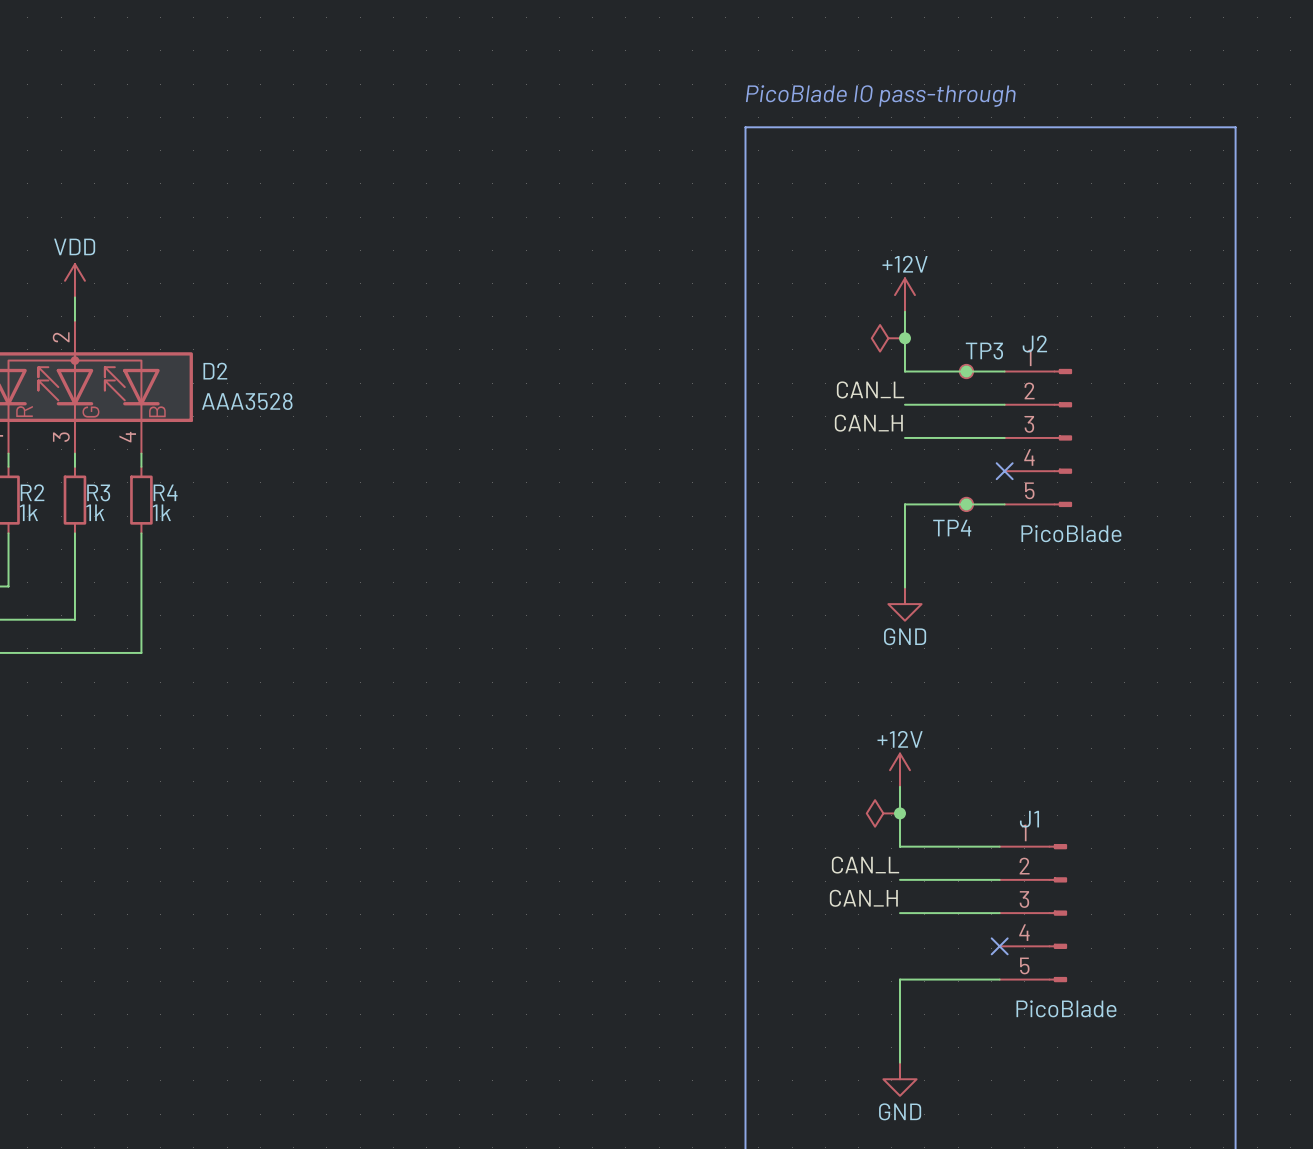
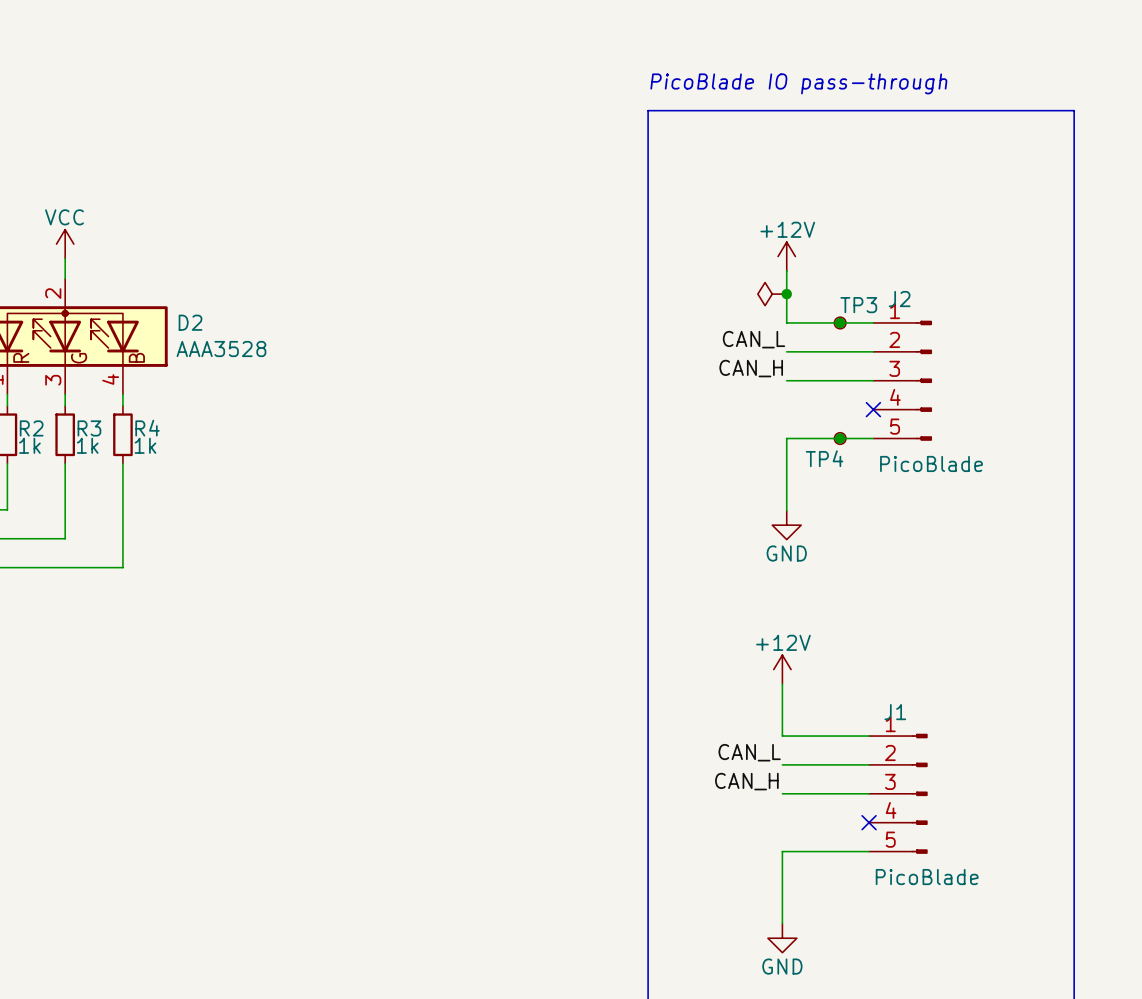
power symbol: VDD (74, 280) -> VCC (65, 244)
power symbol: (883, 813) -> none
junction: (900, 813) -> none

